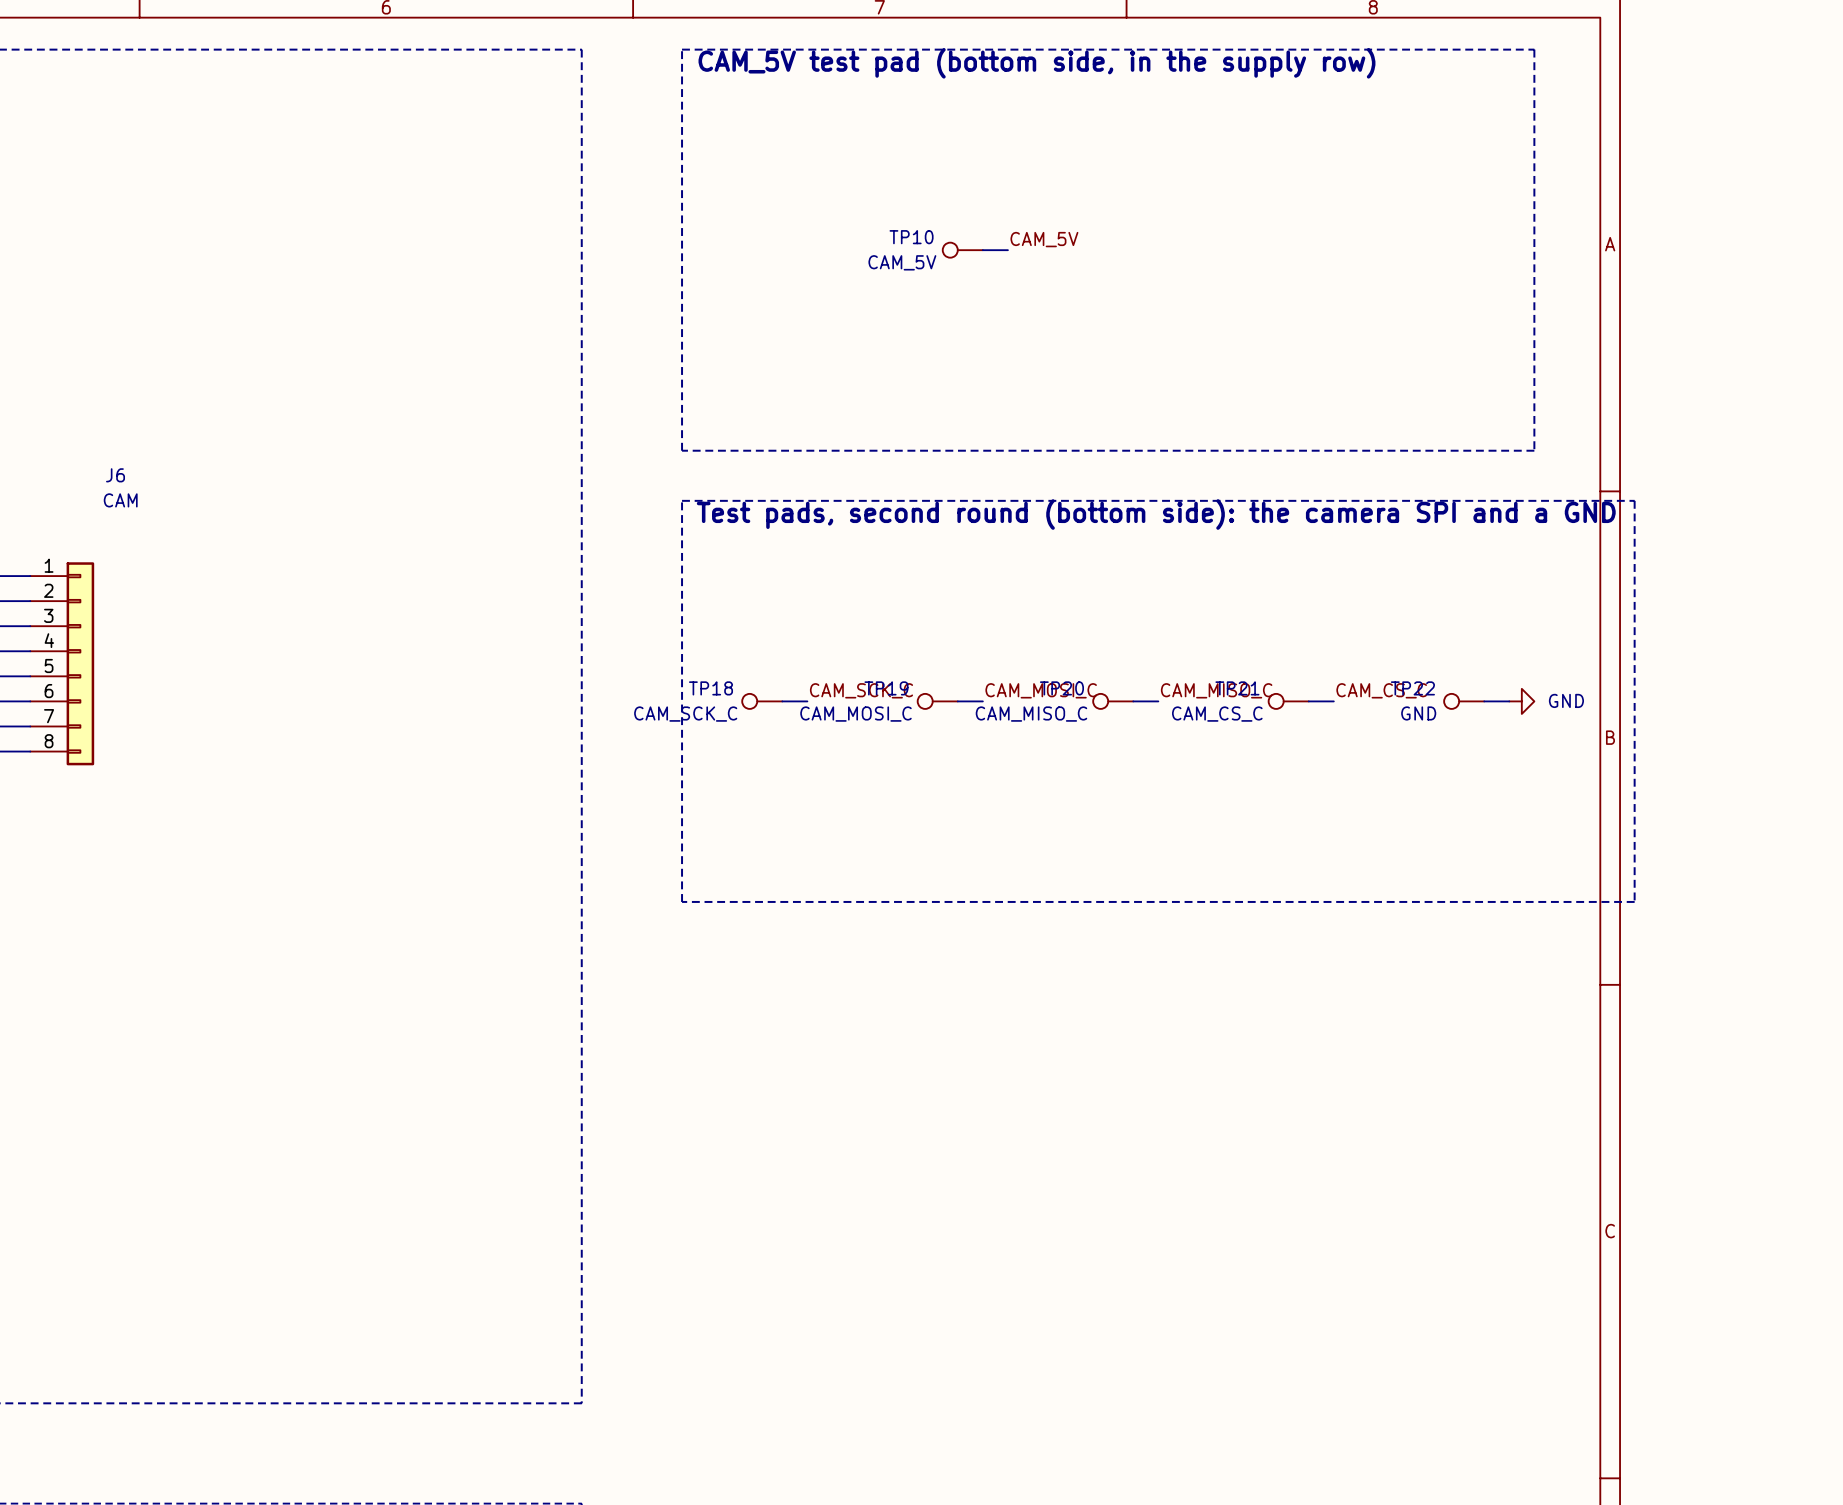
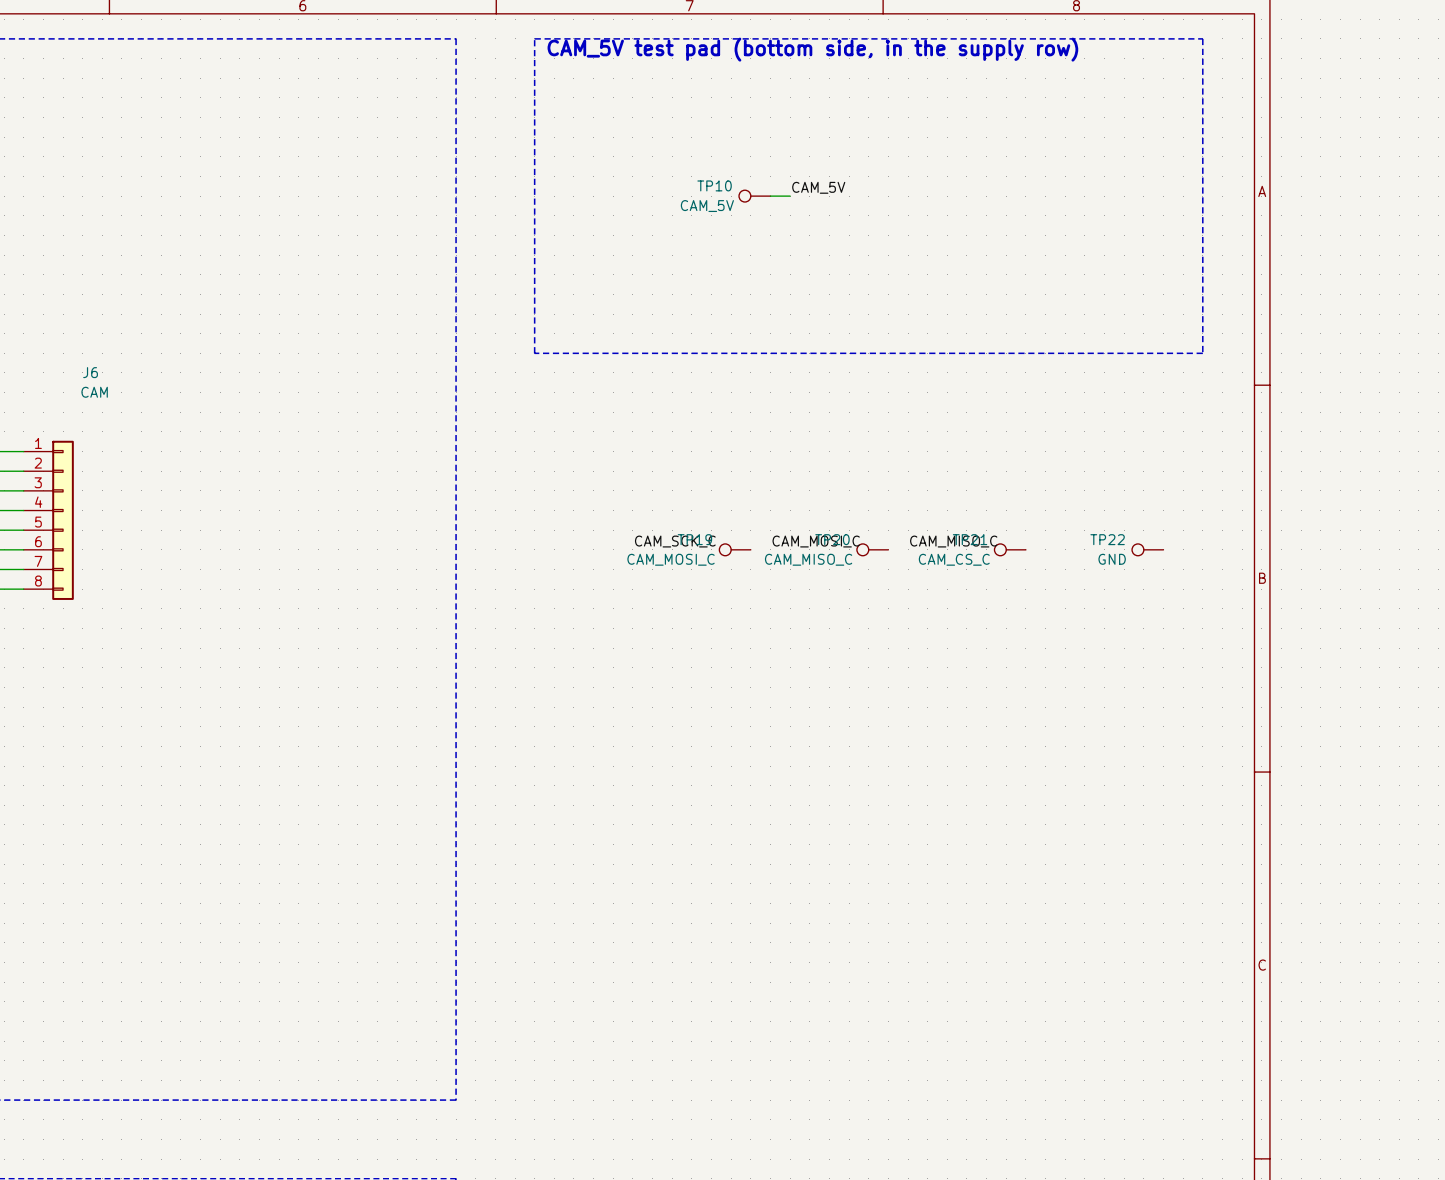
line: (682, 500) (1634, 500) (1634, 901) (682, 901) (682, 500) -> none
text: Test pads, second round (bottom side): the camera SPI and a GND (1156, 514) -> none
label: CAM_CS_C (1381, 690) -> none
TP18: CAM_SCK_C (762, 701) -> none
wire: (782, 701) (807, 701) -> none
wire: (957, 701) (982, 701) -> none
wire: (1133, 701) (1158, 701) -> none
wire: (1308, 701) (1333, 701) -> none
wire: (1484, 701) (1509, 701) -> none
power symbol: GND (1521, 701) -> none

